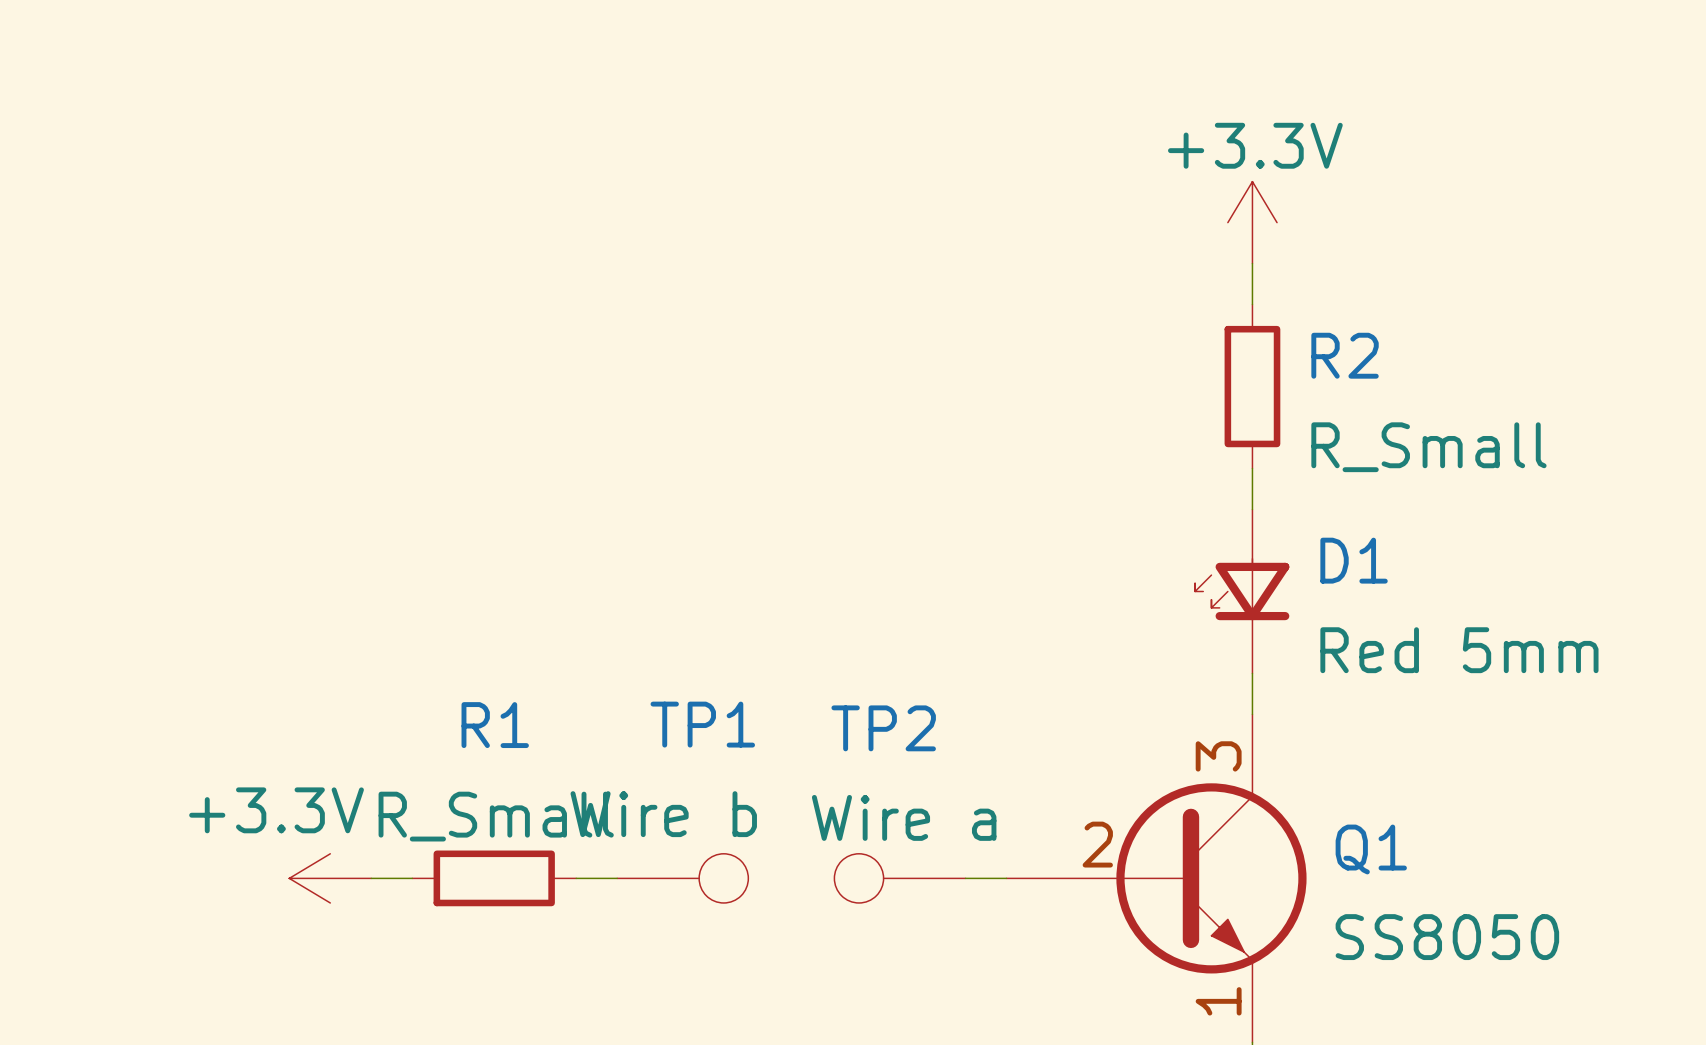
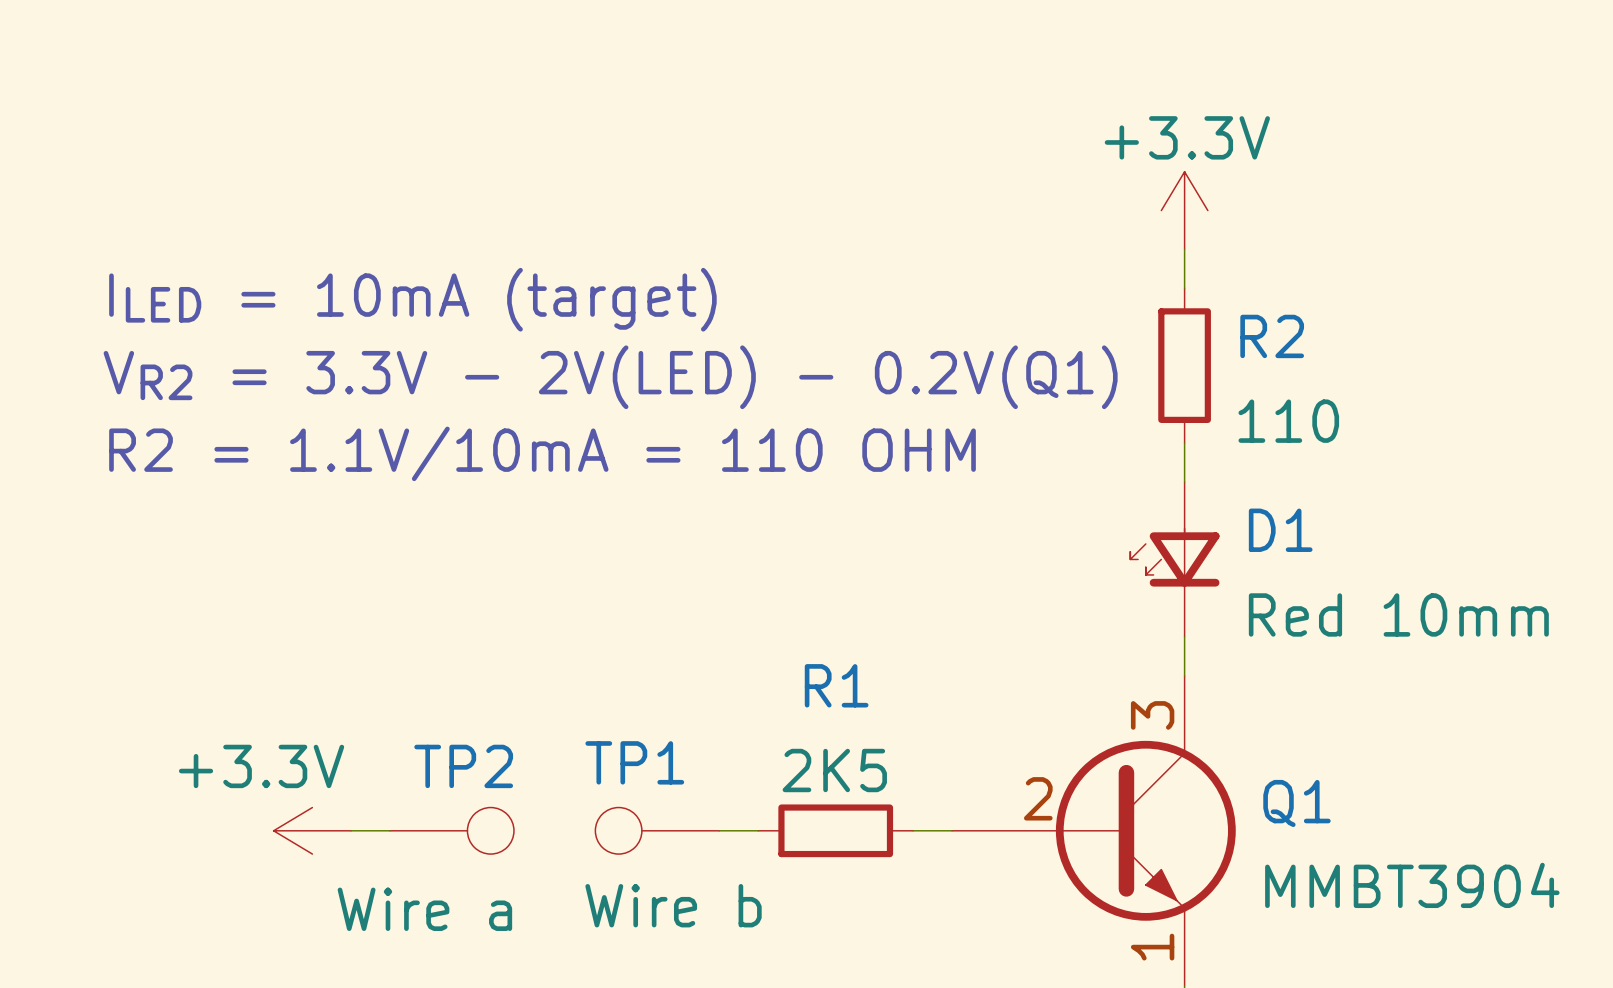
text: none -> ILED = 10mA (target) (412, 299)
text: none -> VR2 = 3.3V - 2V(LED) - 0.2V(Q1) (610, 377)
R2 value: R_Small (1428, 447) -> 110 (1288, 421)
text: none -> R2 = 1.1V/10mA = 110 OHM (542, 453)
D1 value: Red 5mm (1459, 650) -> Red 10mm (1398, 614)
TP1 name position: TP1 (702, 724) -> TP1 (634, 762)
TP2 name position: TP2 (883, 728) -> TP2 (463, 766)
R1 value: R_Small (496, 816) -> 2K5 (834, 770)
R1 position: (494, 878) -> (835, 830)
wire: (576, 878) (617, 878) -> (719, 830) (758, 830)
TP1 rotation: 0° (723, 878) -> 180° (618, 830)
TP2 rotation: 0° (858, 878) -> 180° (490, 830)
TP2 position: (899, 878) -> (451, 830)
Q1 value: SS8050 (1447, 937) -> MMBT3904 (1412, 885)

